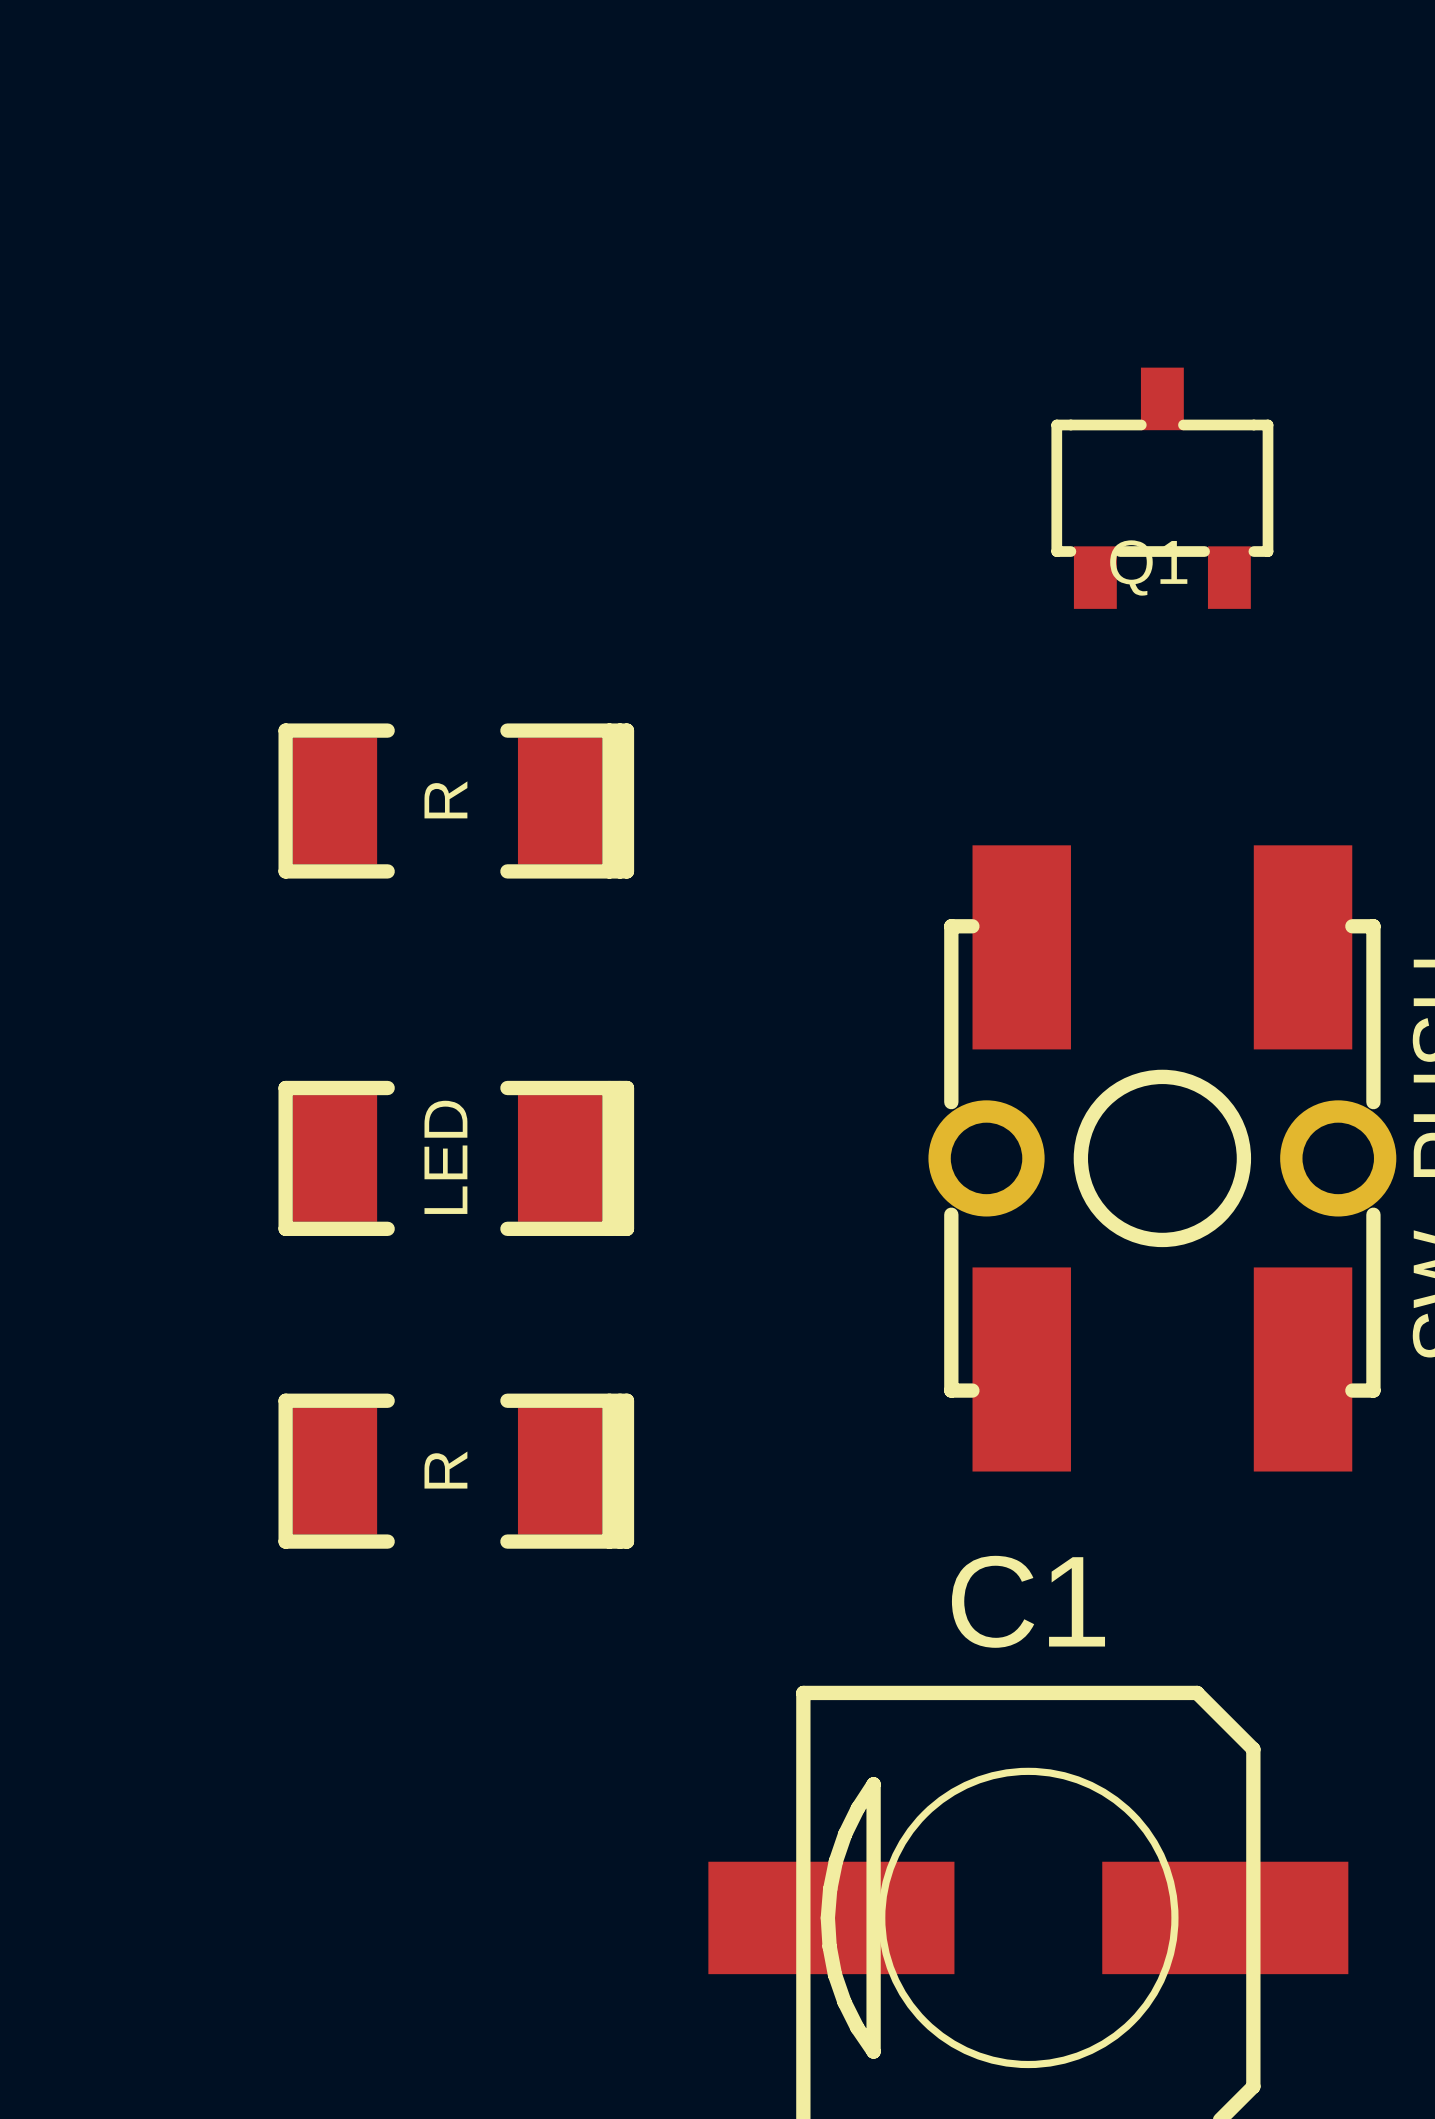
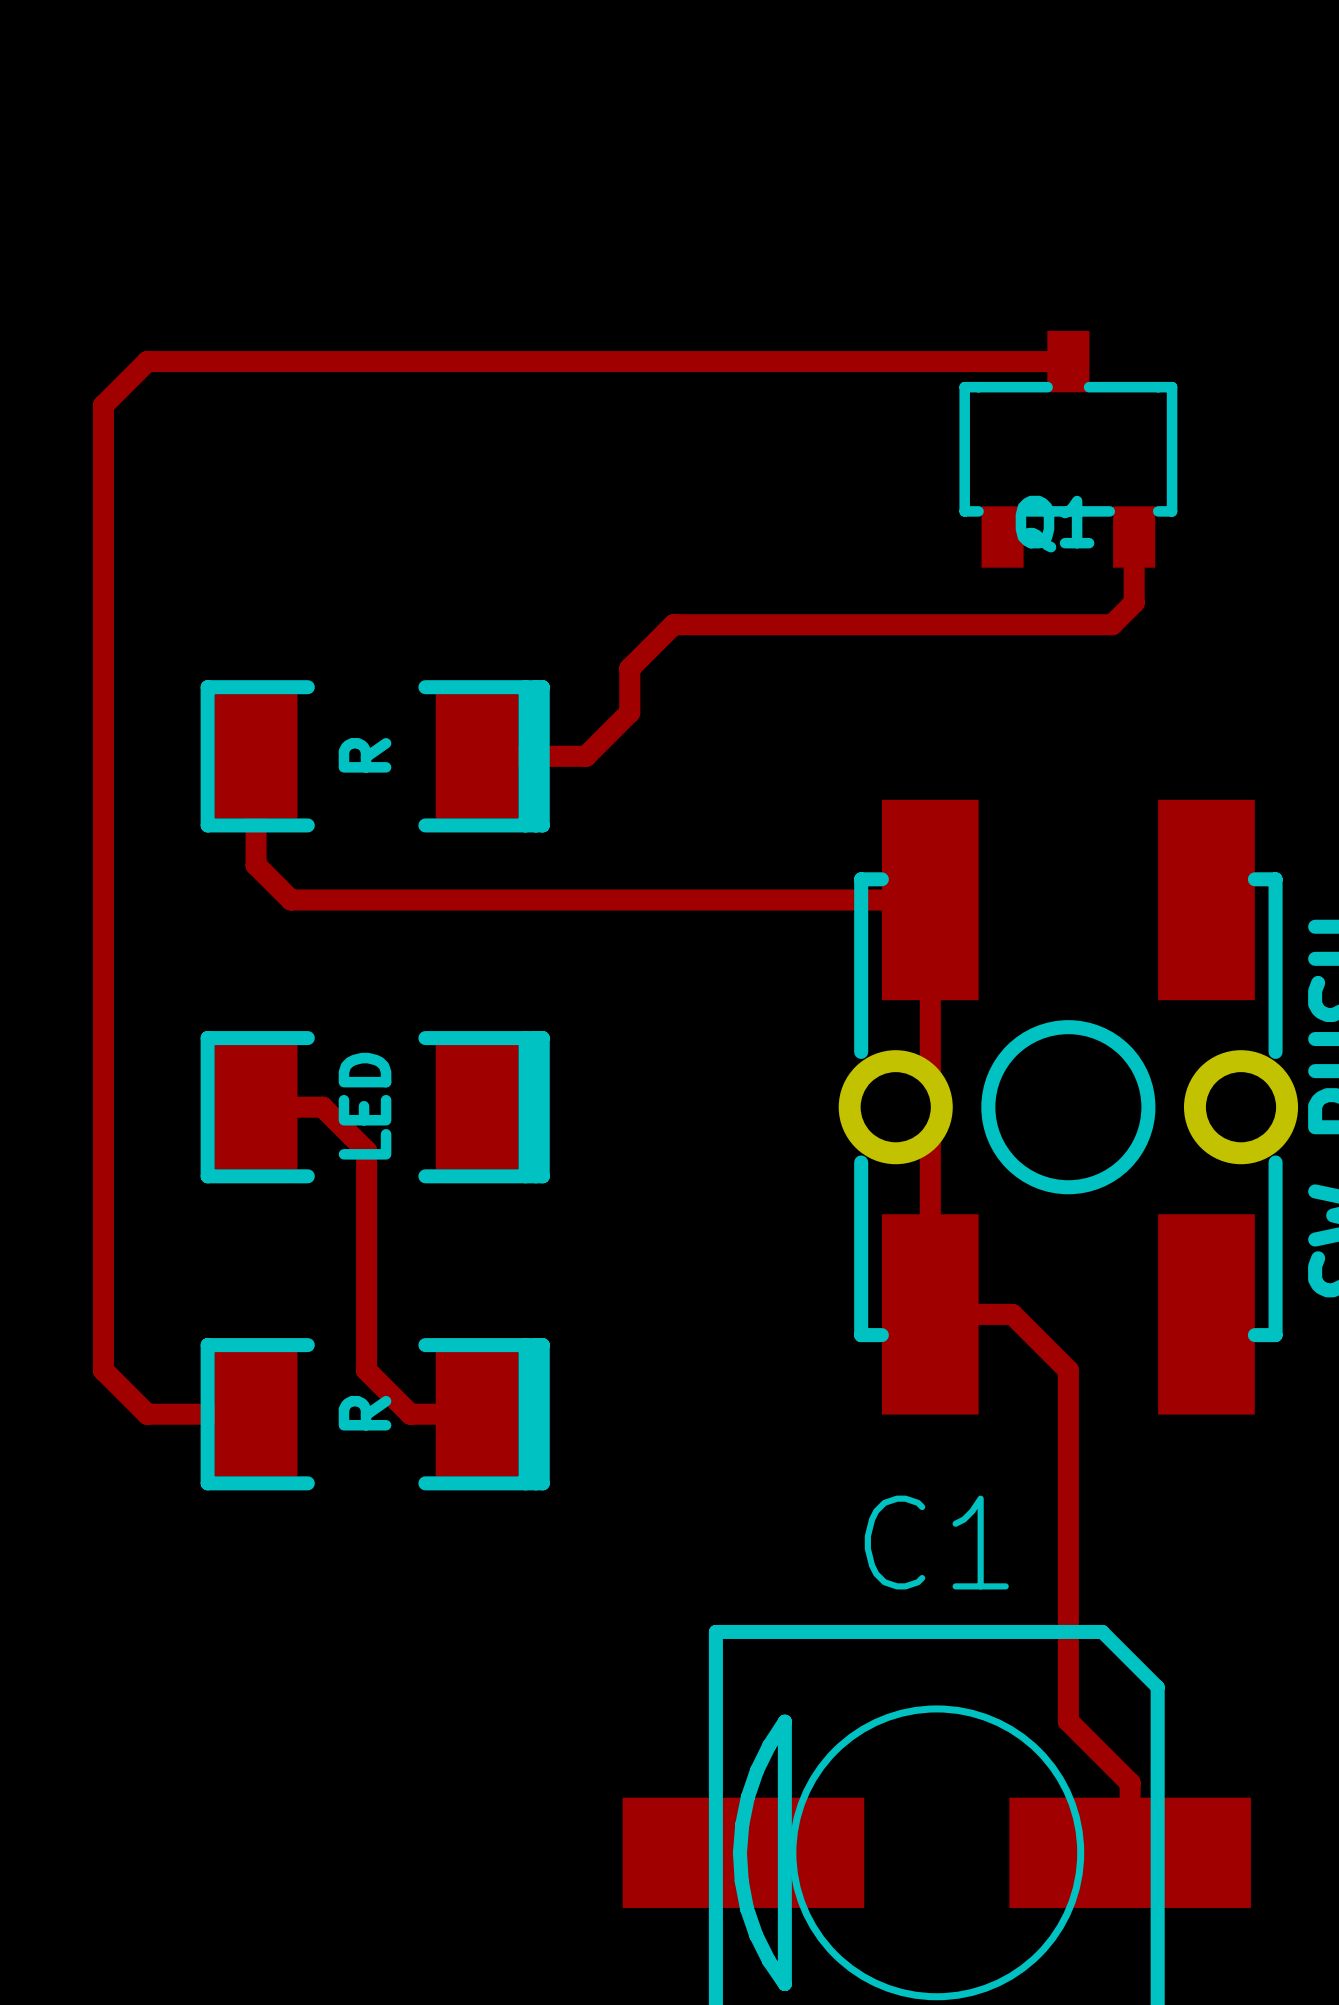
track: none -> (1068, 361) (147, 361) (103, 405) (103, 1370) (147, 1414) (256, 1414)
track: none -> (1134, 537) (1134, 602) (1112, 624) (673, 624) (629, 668) (629, 712) (585, 756) (477, 756)
track: none -> (256, 756) (256, 865) (290, 900) (930, 900) (930, 1069) (895, 1104) (895, 1107) (930, 1141) (930, 1314) (1012, 1314) (1068, 1370) (1068, 1721) (1130, 1783) (1130, 1852)
track: none -> (256, 1107) (322, 1107) (366, 1151) (366, 1370) (410, 1414) (477, 1414)

